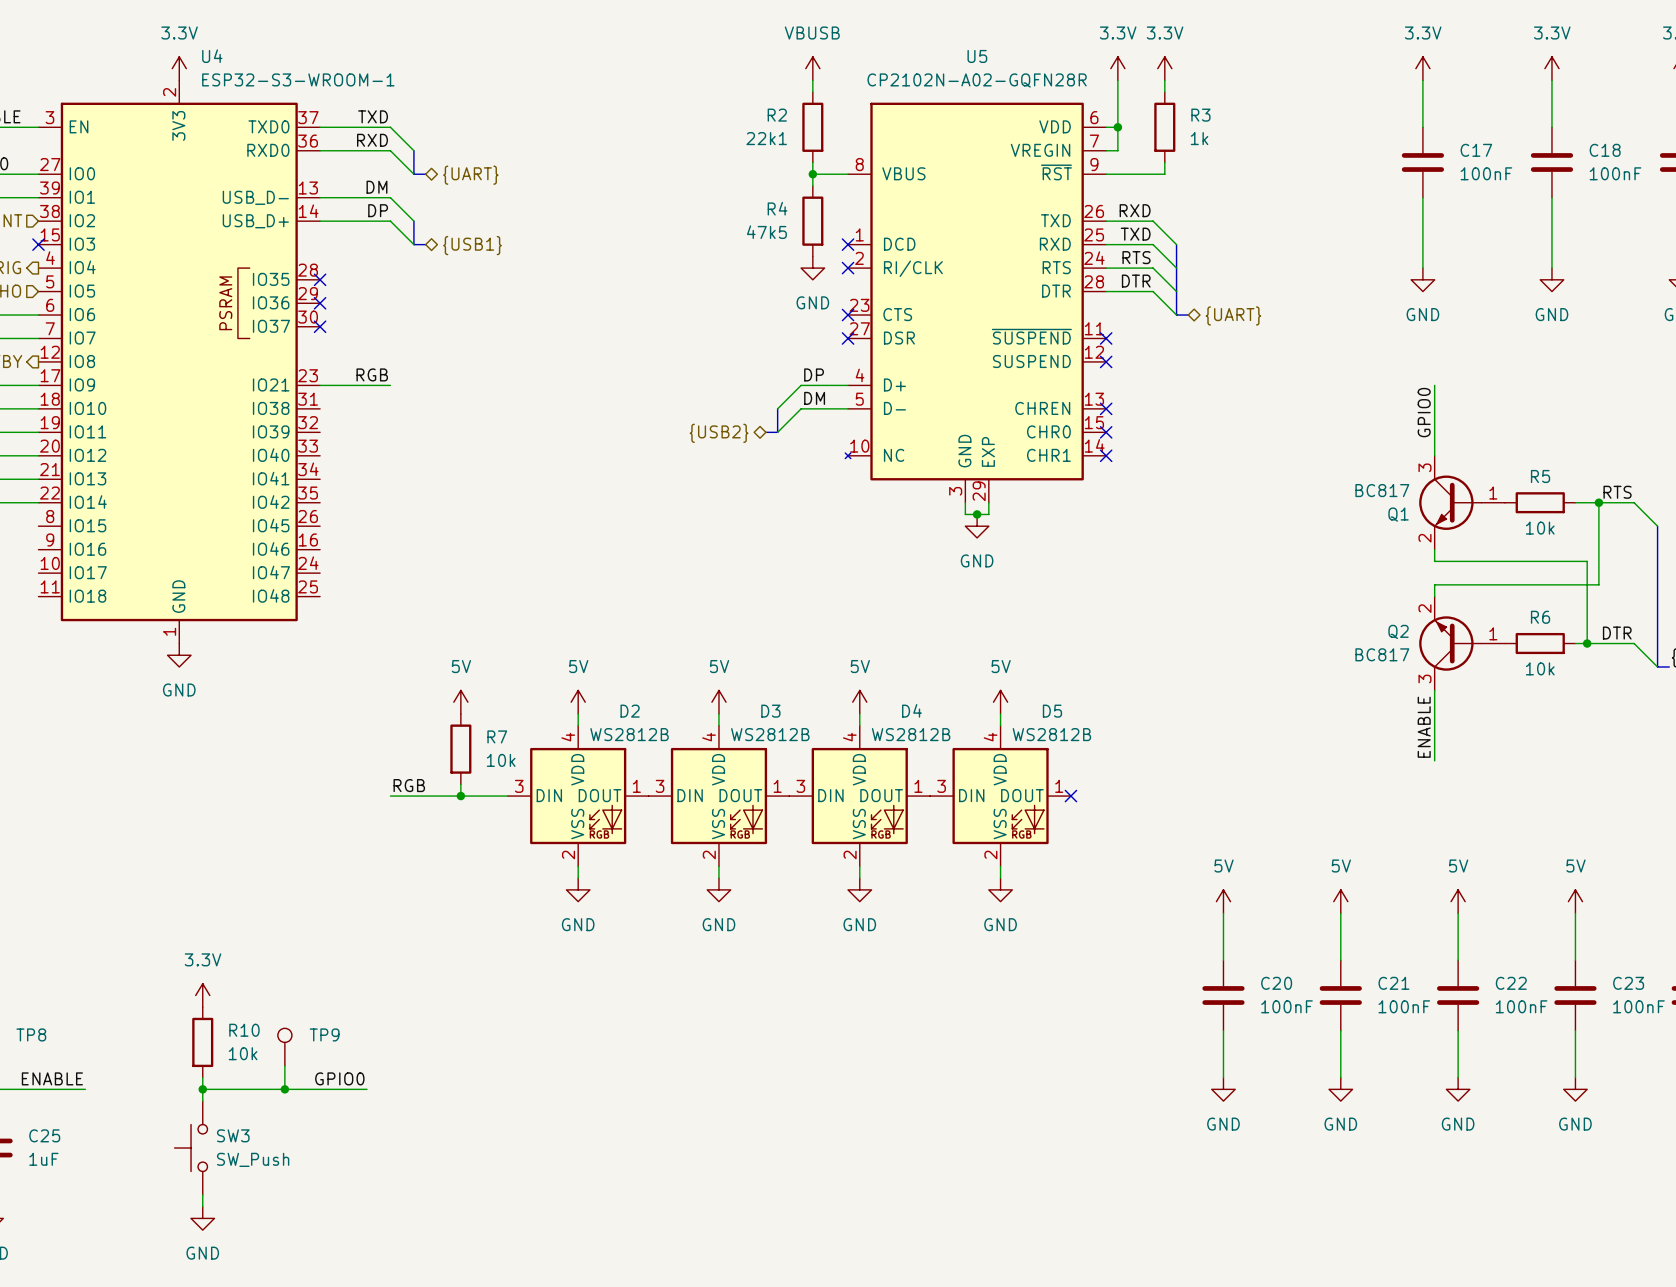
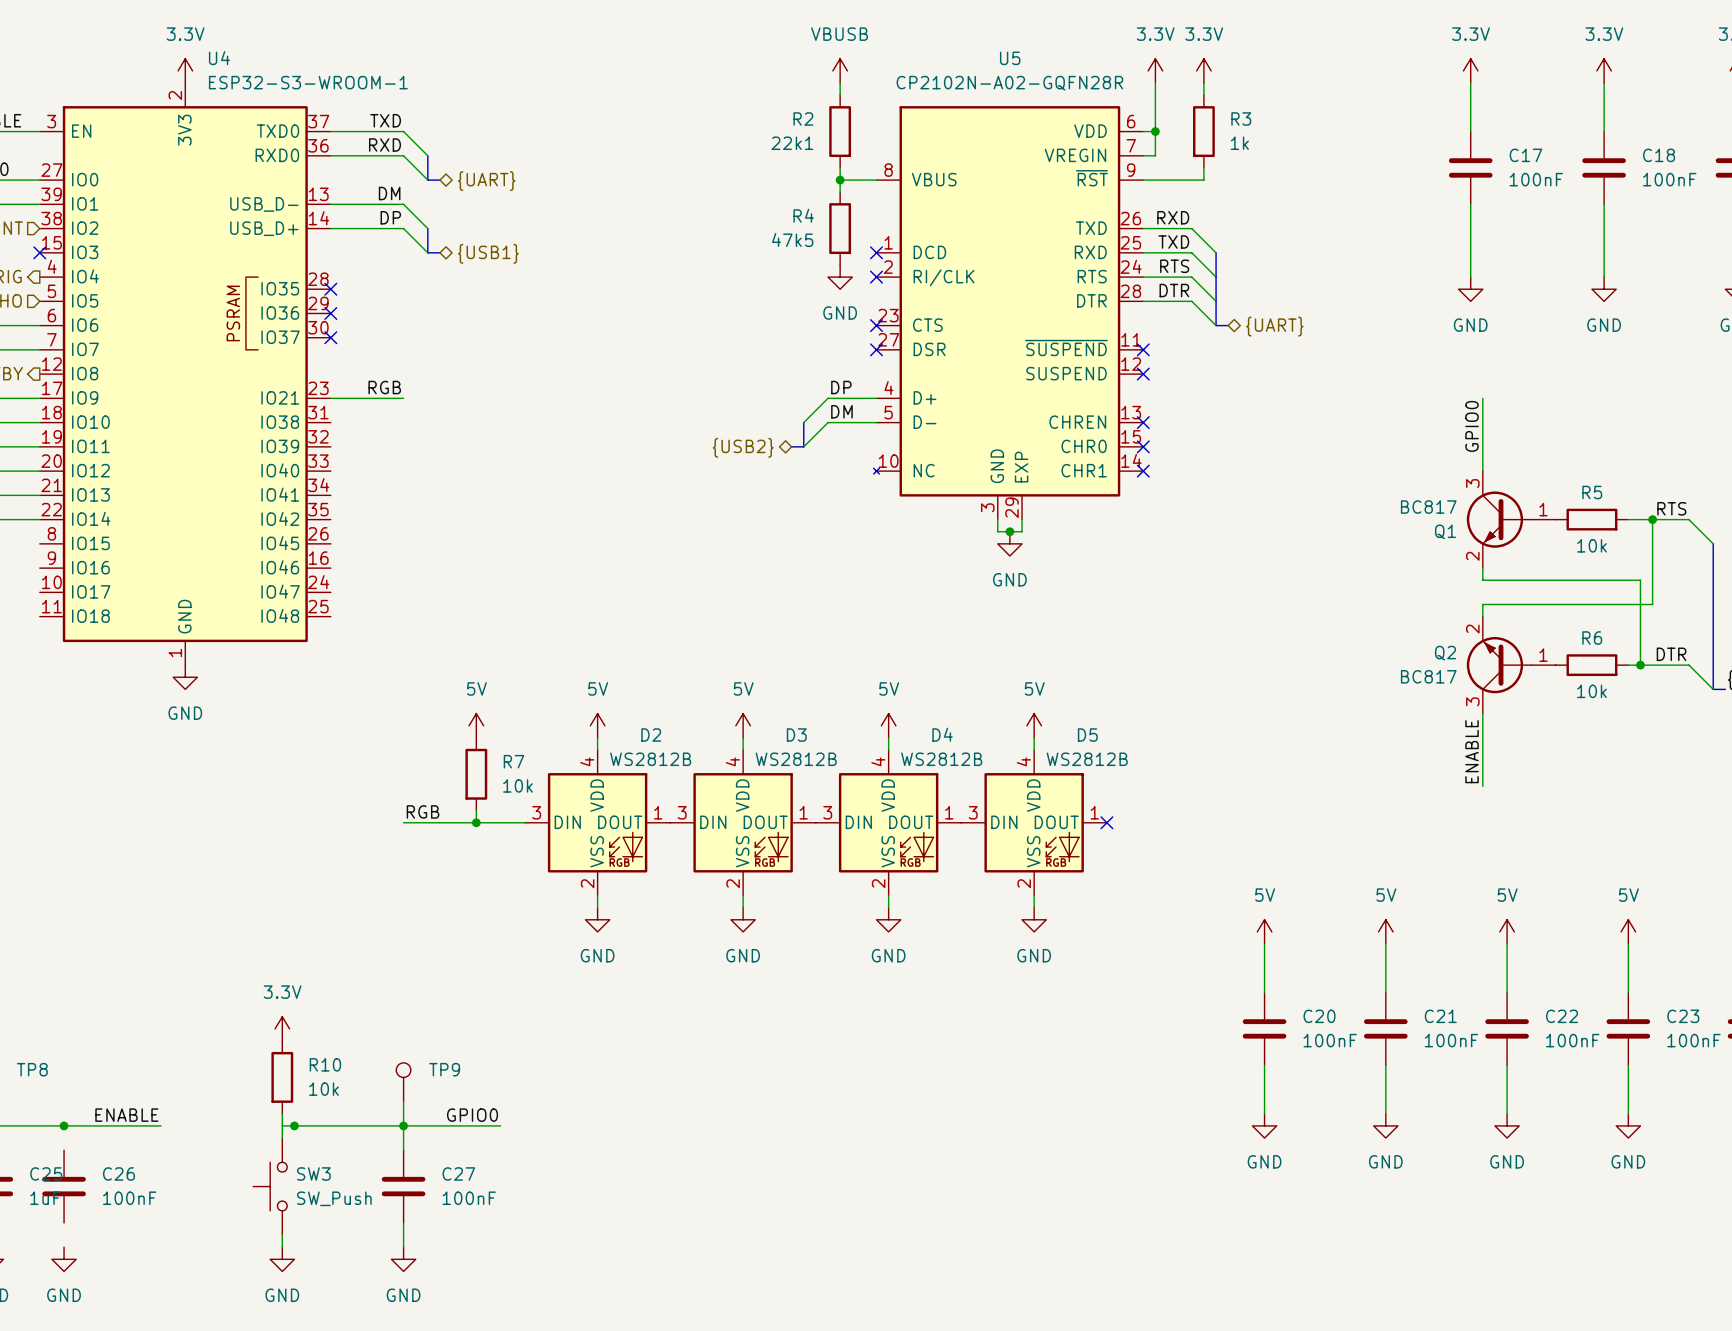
power symbol position: 3.3V (202, 995) -> 3.3V (282, 1028)
R10 position: (202, 1042) -> (282, 1077)
TP9 position: (284, 1047) -> (403, 1082)
wire: (284, 1065) (284, 1089) -> (403, 1222) (403, 1247)
wire: none -> (403, 1101) (403, 1150)
wire: (202, 1077) (202, 1101) -> (282, 1113) (282, 1138)
label position: ENABLE (52, 1078) -> ENABLE (126, 1115)
label position: GPIO0 (339, 1078) -> GPIO0 (472, 1115)
junction: none -> (64, 1125)
wire: (202, 1089) (273, 1089) -> (88, 1125) (161, 1125)
junction: (202, 1089) -> none
wire: none -> (379, 1125) (500, 1125)
junction: none -> (403, 1125)
C26: none -> 100nF (64, 1186)
SW3 position: (191, 1148) -> (270, 1186)
C27: none -> 100nF (403, 1186)
wire: (202, 1194) (202, 1206) -> (282, 1235) (282, 1247)
power symbol: none -> GND (64, 1259)
power symbol: GND (202, 1218) -> none
power symbol: none -> GND (282, 1259)
power symbol: none -> GND (403, 1259)

